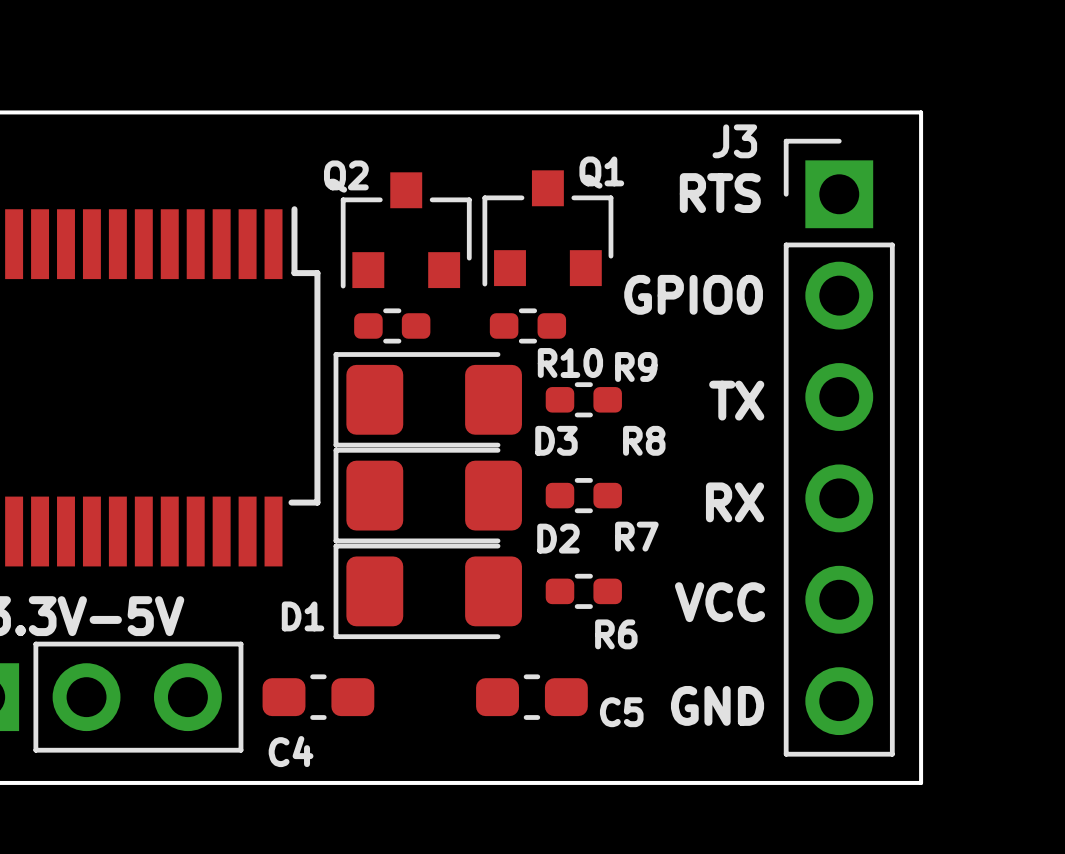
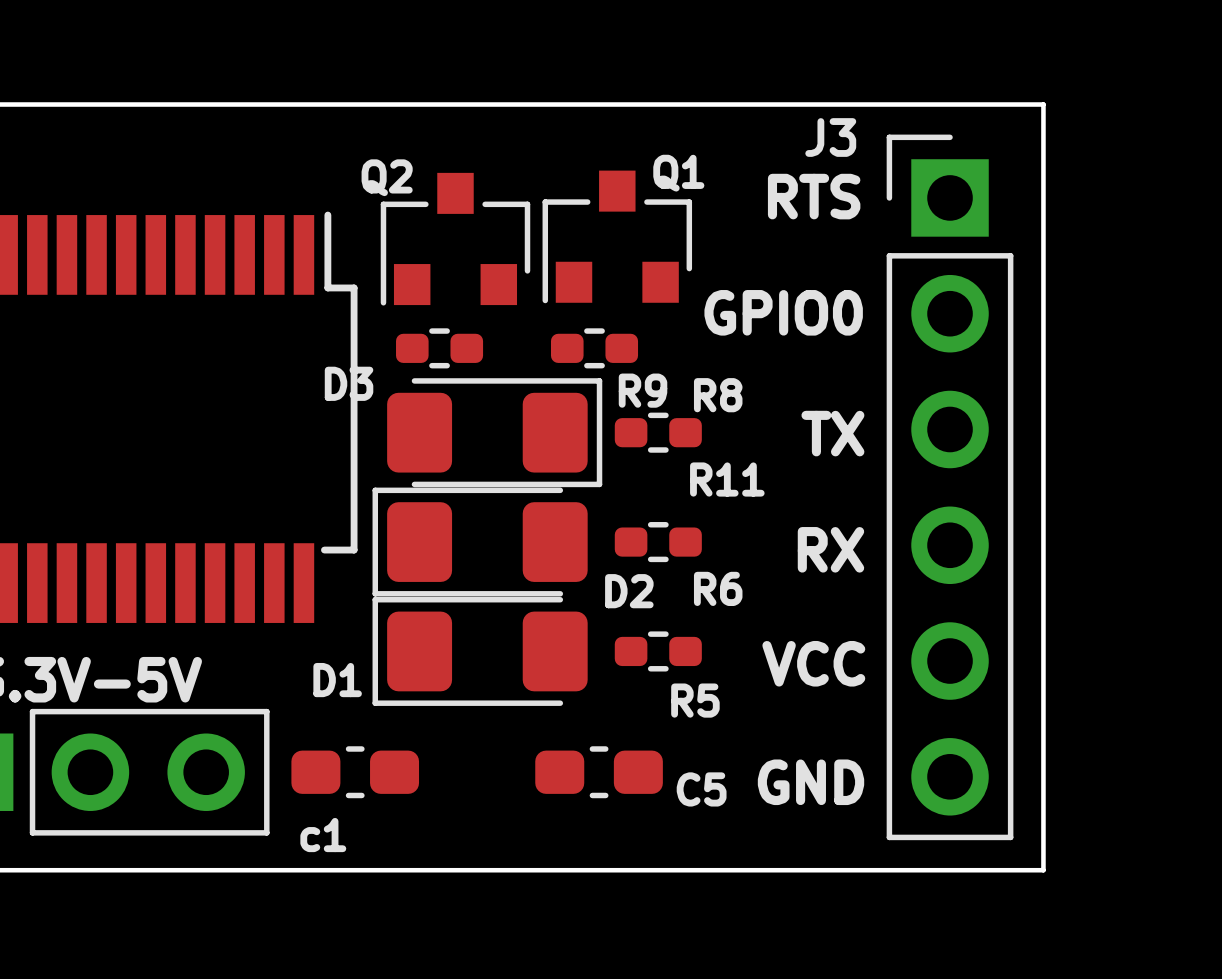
R10 name: R10 (570, 362) -> R9 (643, 390)
R9 name: R9 (636, 366) -> R8 (718, 395)
D3 rotation: 0° (427, 399) -> 180° (494, 432)
R8 name: R8 (644, 440) -> R11 (727, 479)
R7 name: R7 (636, 536) -> R6 (718, 588)
R6 name: R6 (616, 634) -> R5 (695, 700)
C4 name: C4 (291, 751) -> c1 (323, 835)

